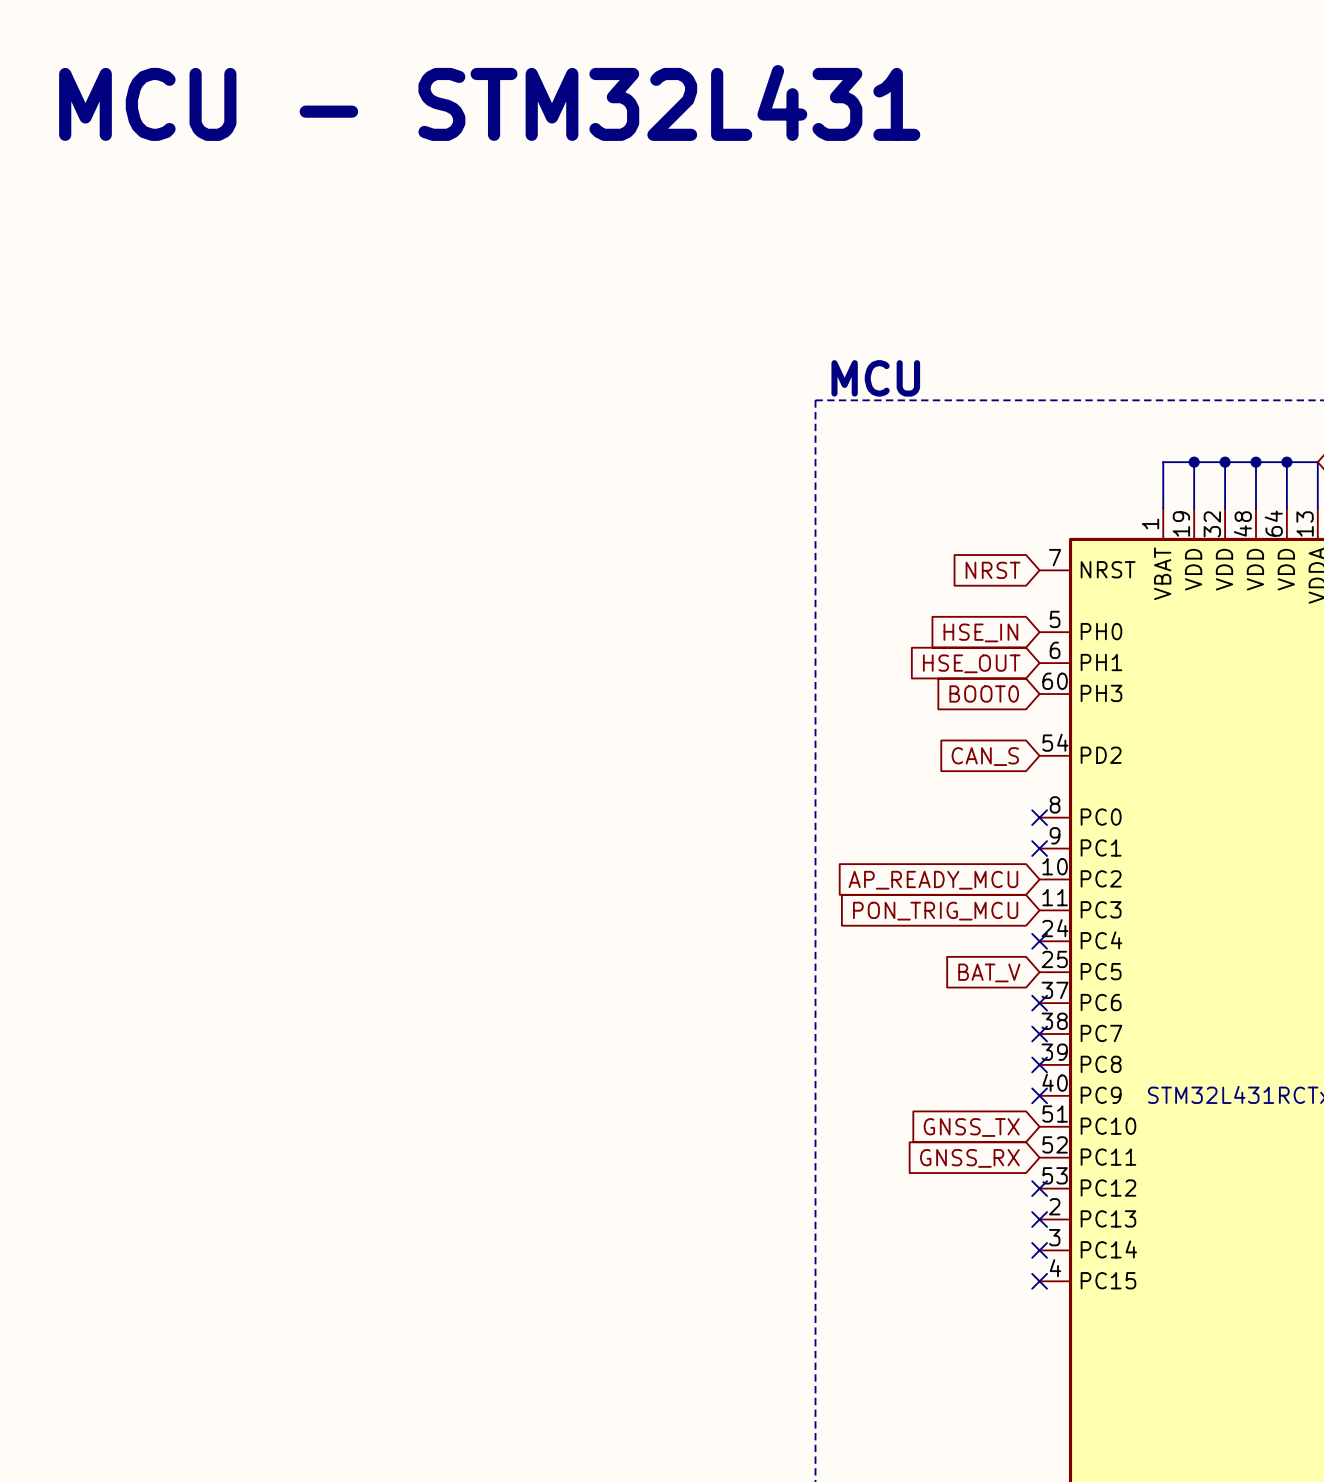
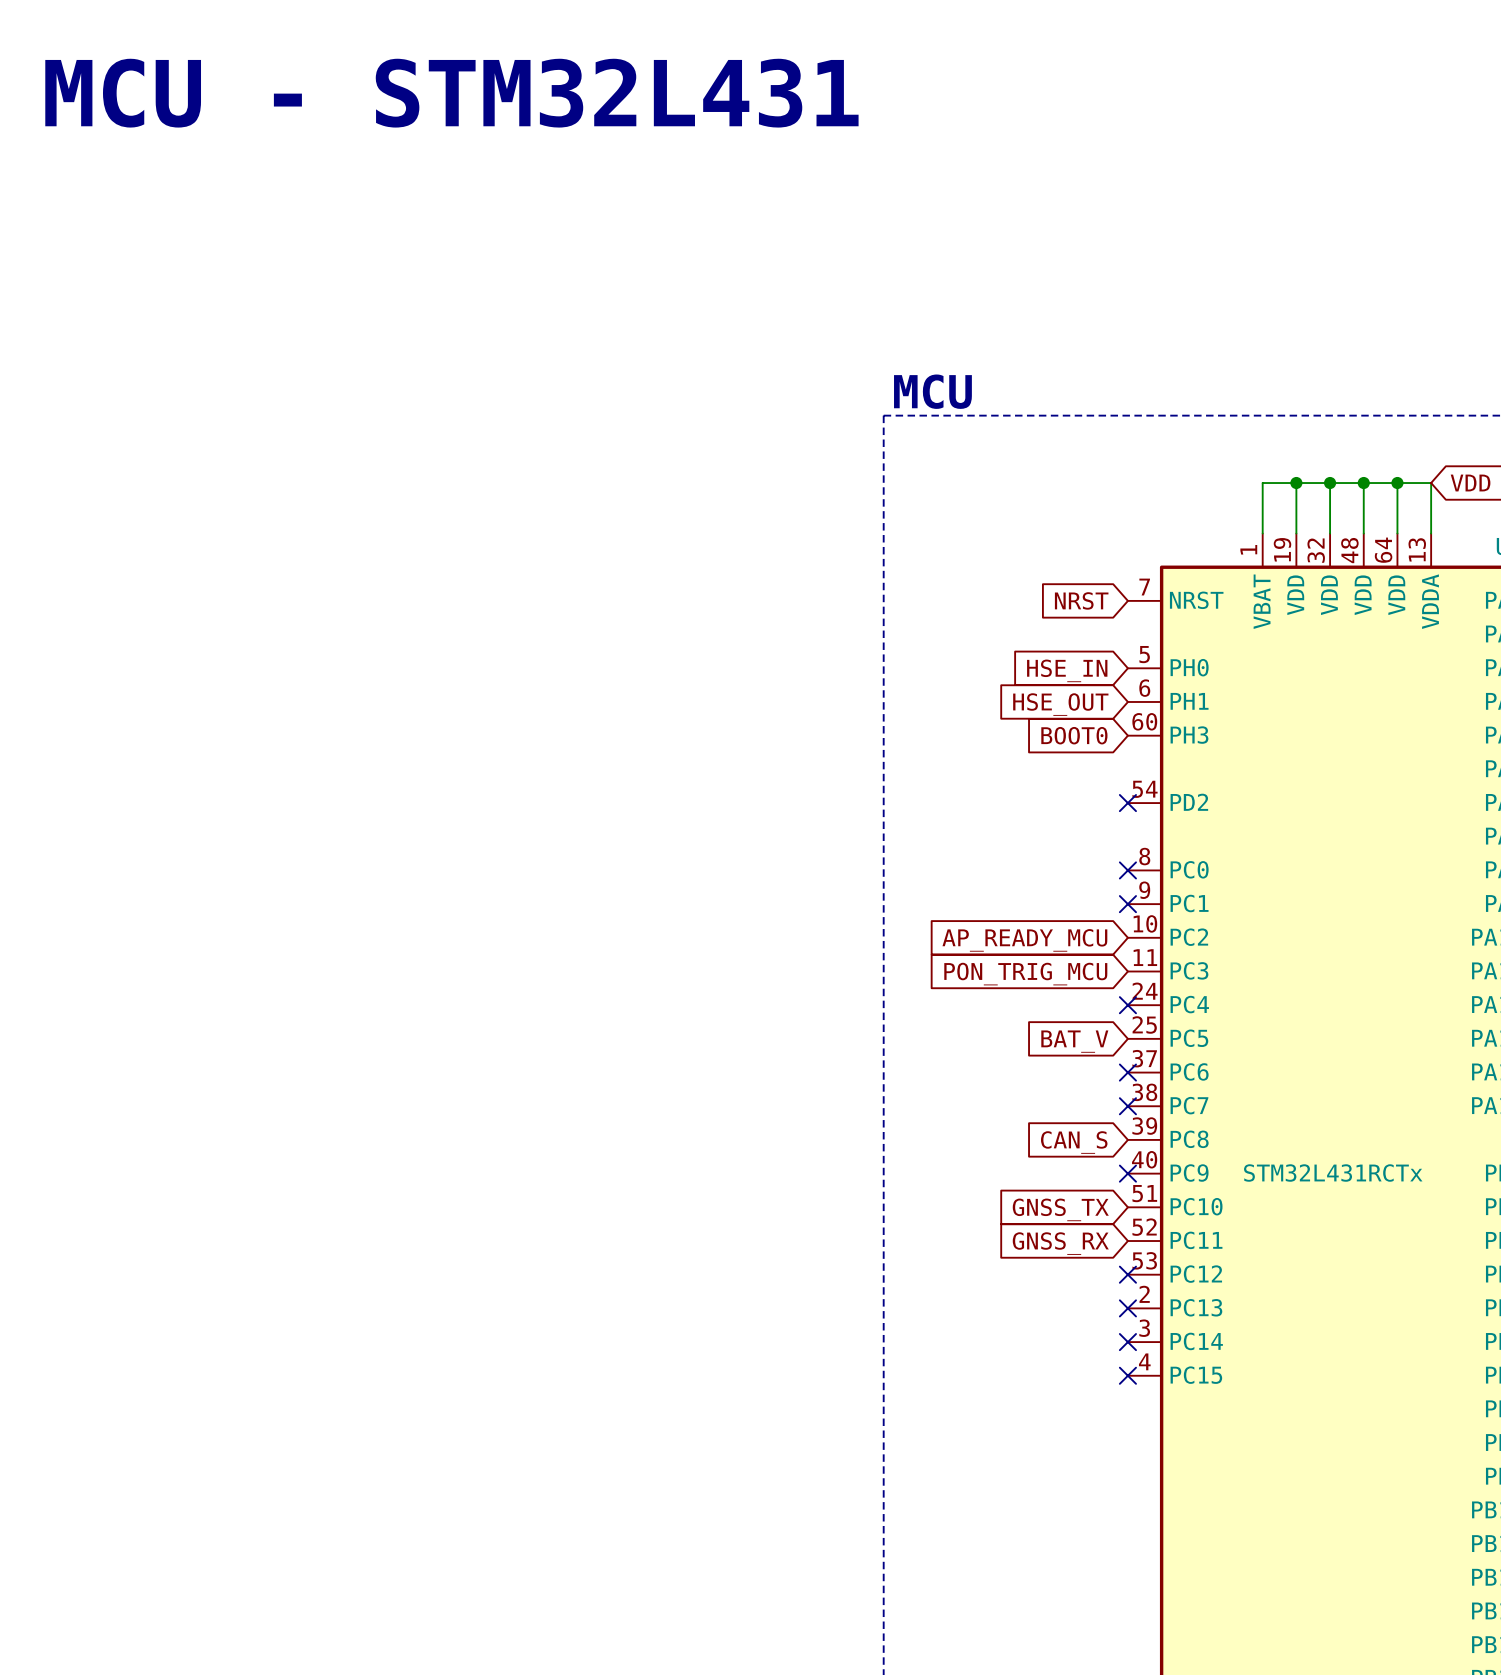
no-connect mark: none -> (1127, 803)
global label: CAN_S (985, 756) -> none
no-connect mark: (1039, 1064) -> none
global label: none -> CAN_S (1074, 1142)

